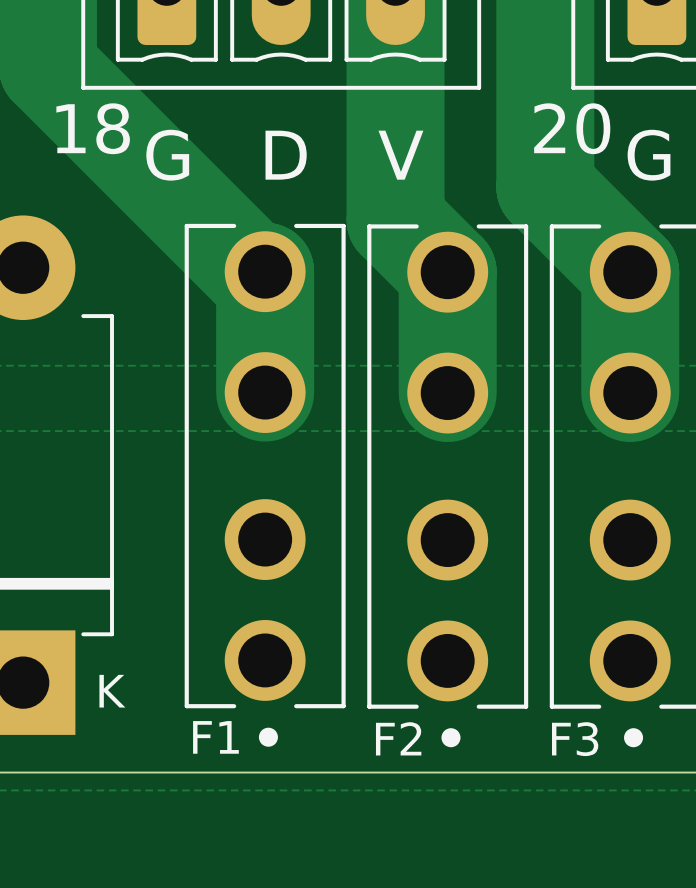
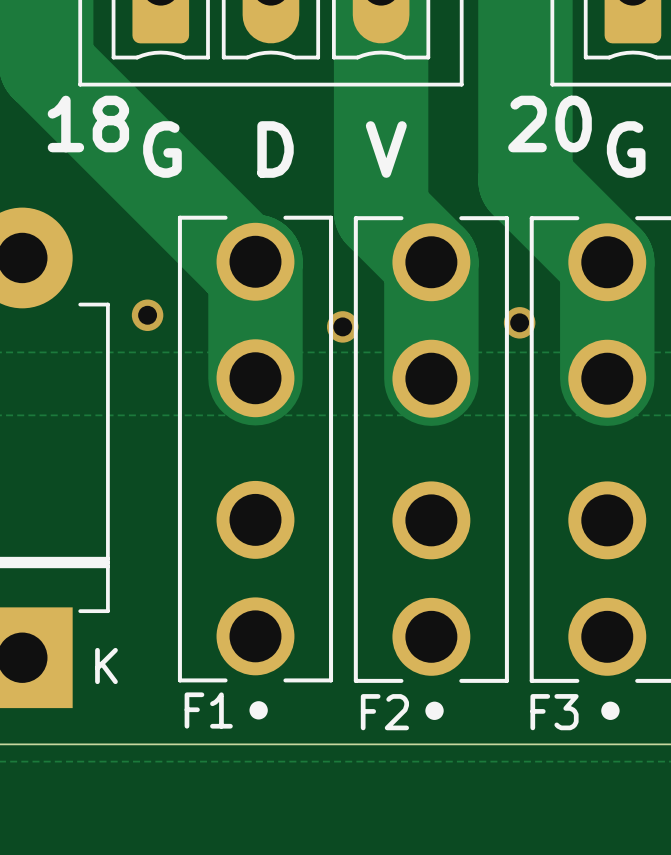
via: none -> (147, 315)
via: none -> (519, 322)
via: none -> (342, 326)

